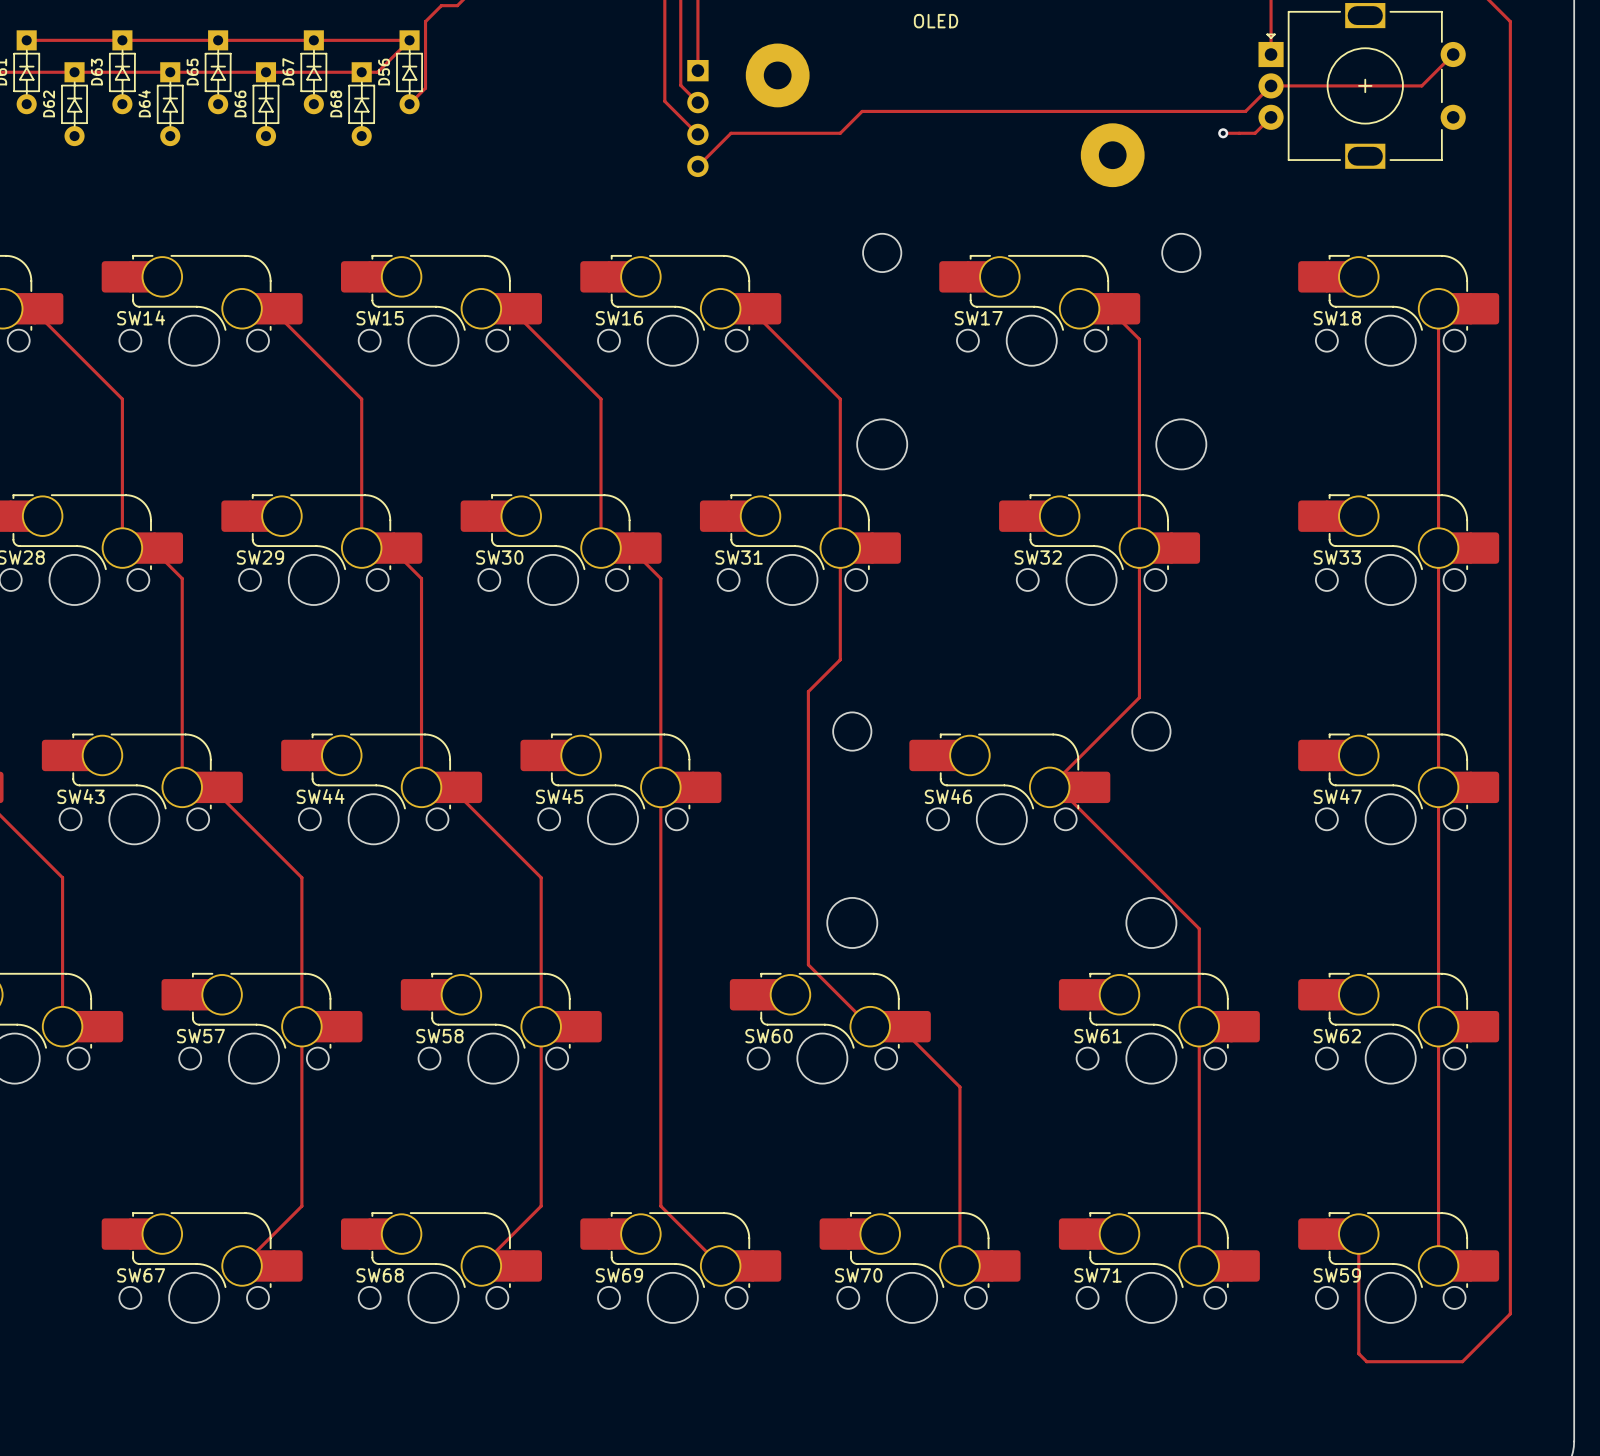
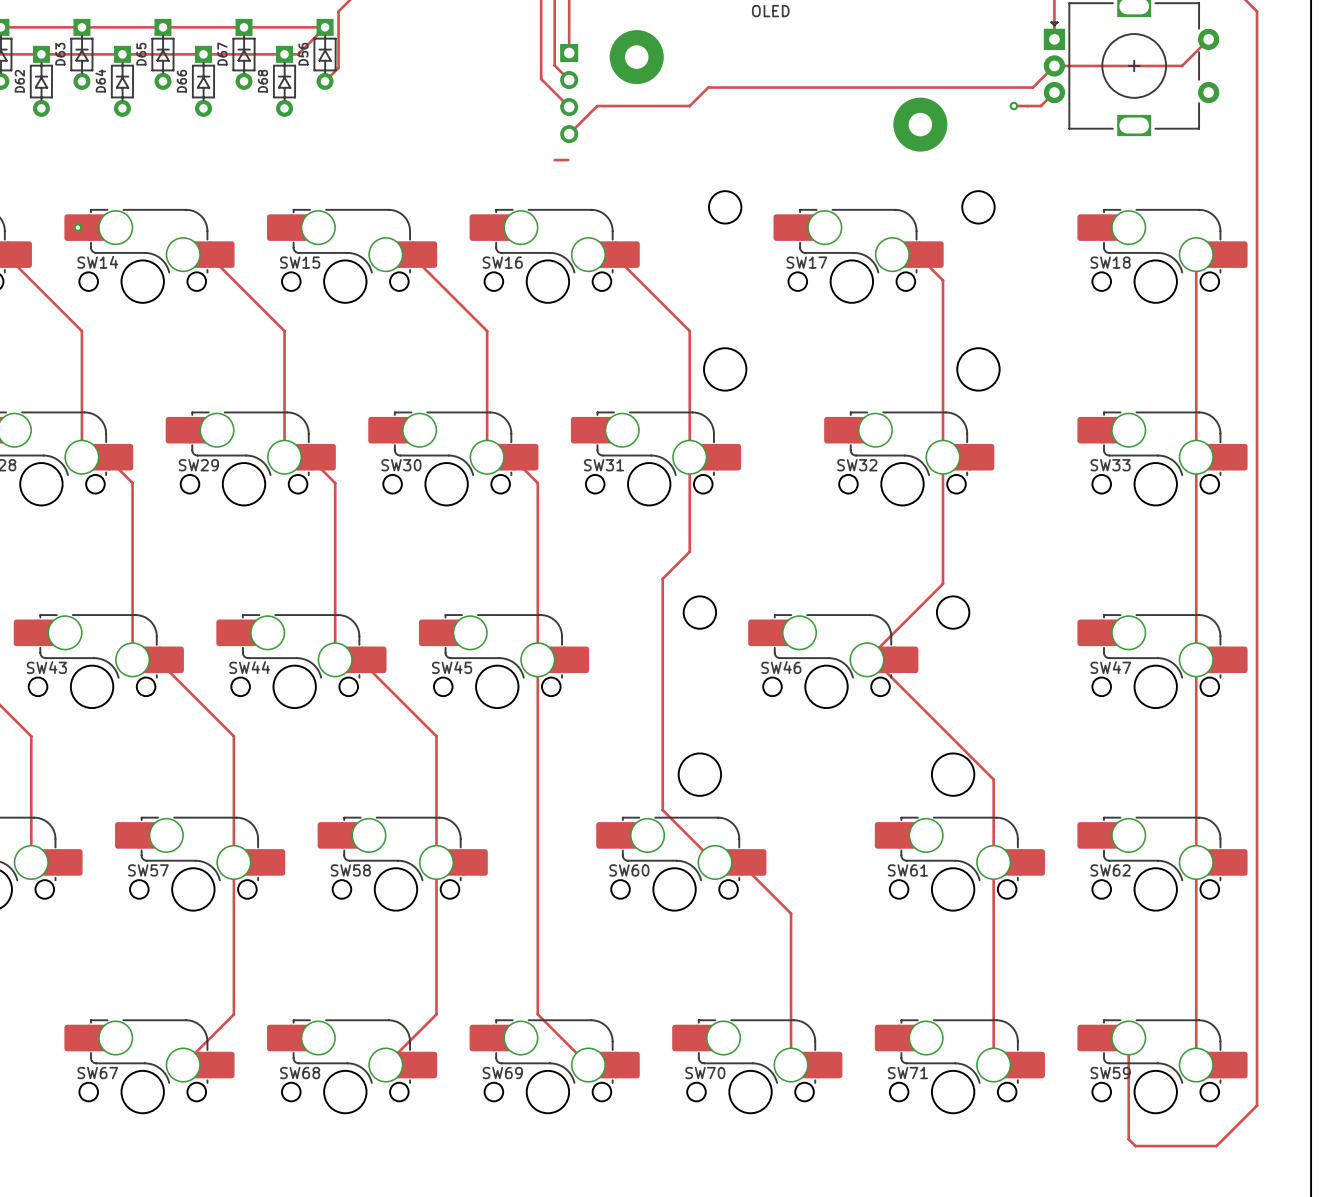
track: none -> (554, 160) (568, 160)
via: none -> (77, 227)

